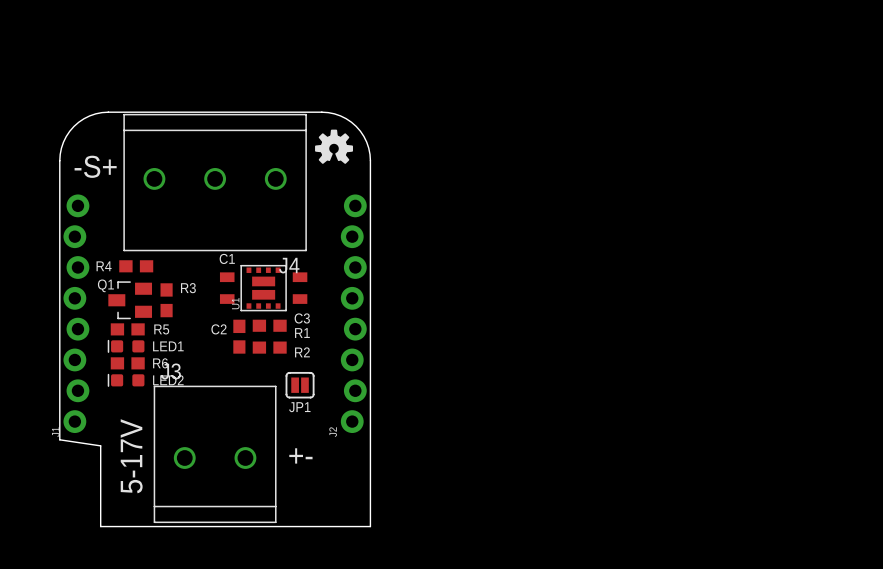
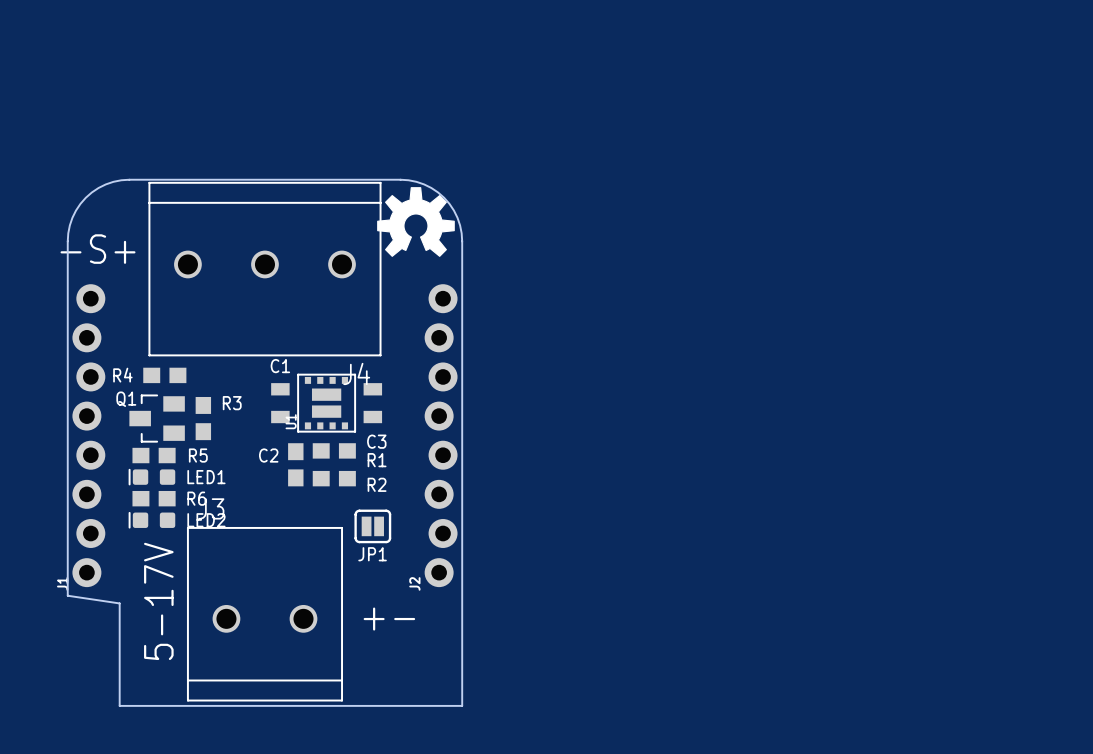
drawing shape: [315, 129, 353, 164] -> [377, 187, 455, 257]

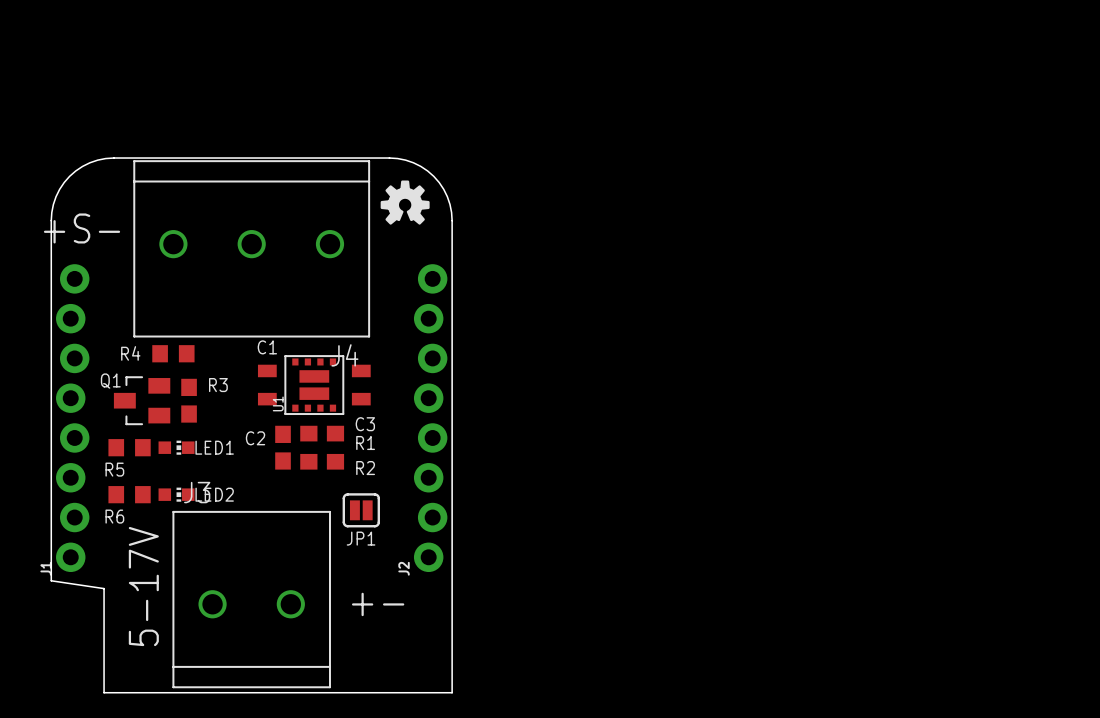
drawing shape: [377, 187, 455, 257] -> [380, 180, 430, 225]
text: -S+ (98, 249) -> +S- (82, 228)
R4 footprint: [143, 367, 187, 384] -> [152, 345, 195, 363]
R5 footprint: [132, 447, 176, 464] -> [108, 439, 151, 457]
R5 name position: R5 (198, 455) -> R5 (114, 469)
LED1 footprint: [128, 468, 176, 486] -> [158, 440, 195, 455]
R6 footprint: [132, 490, 176, 507] -> [108, 486, 151, 504]
R6 name position: R6 (196, 498) -> R6 (114, 516)
LED2 footprint: [128, 511, 176, 529] -> [158, 487, 195, 502]

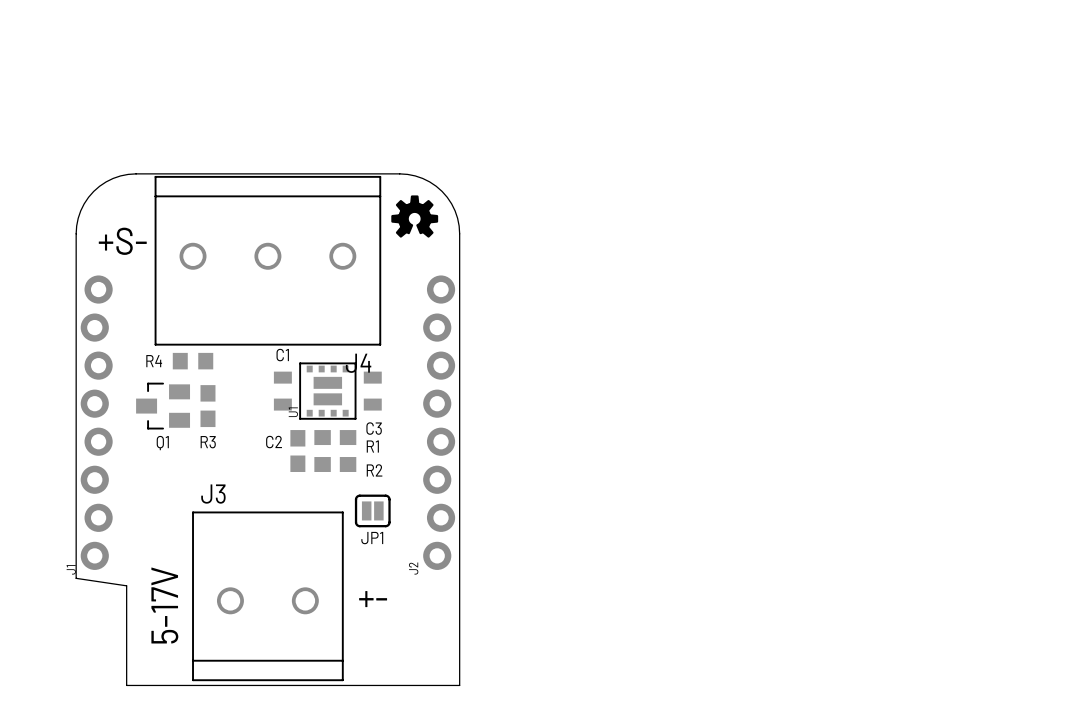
Q1 name position: Q1 (110, 381) -> Q1 (162, 443)
R3 name position: R3 (218, 385) -> R3 (208, 442)
R5: (129, 447) -> none
LED1: (176, 447) -> none
R6: (129, 494) -> none
LED2: (176, 494) -> none

